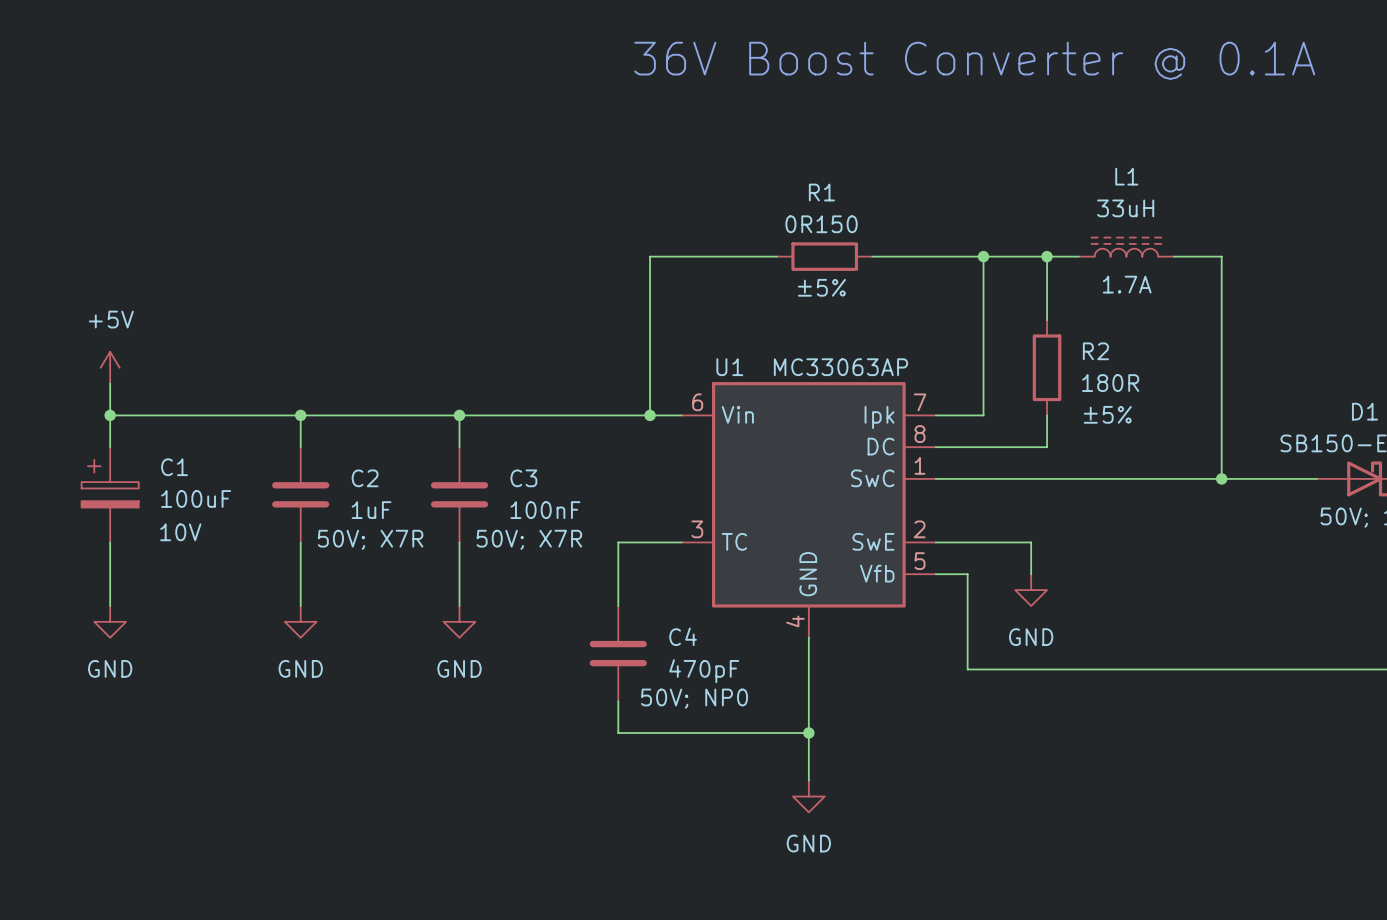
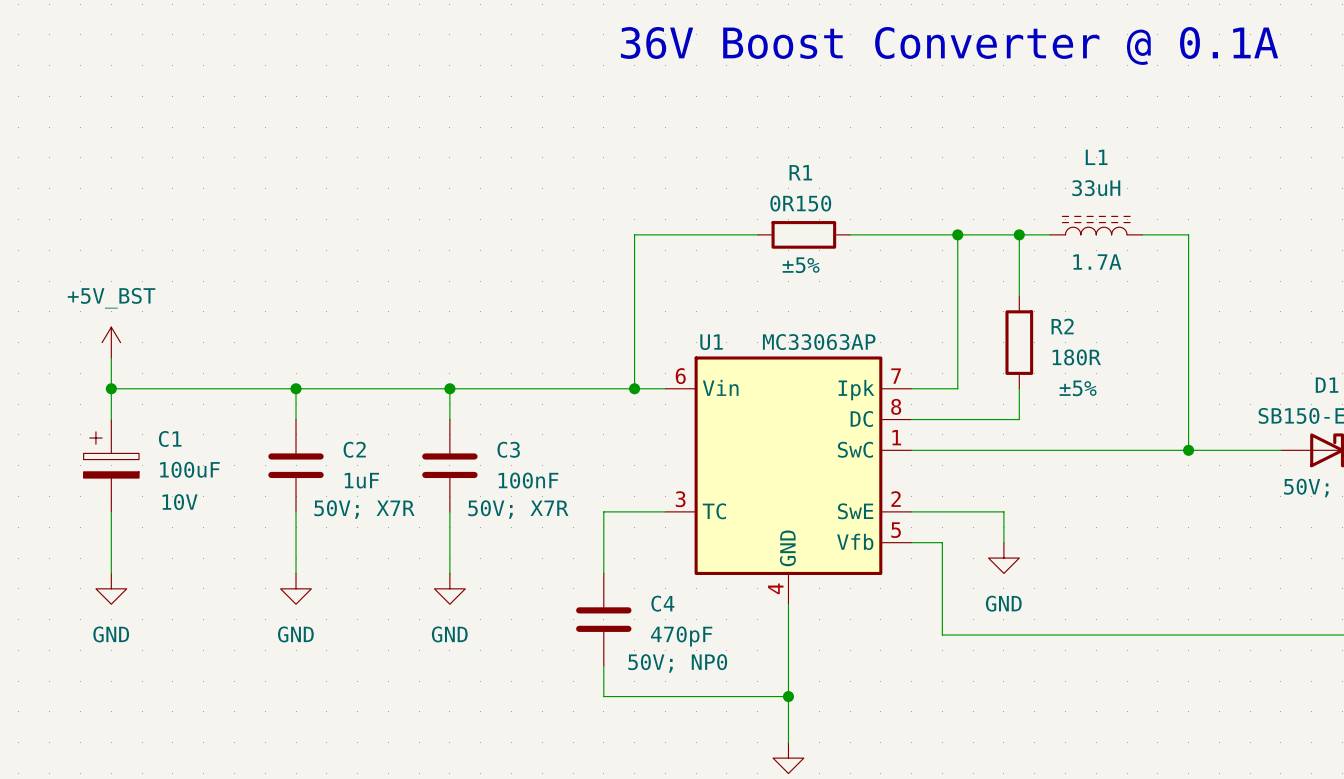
power symbol: +5V (110, 367) -> +5V_BST (111, 342)

